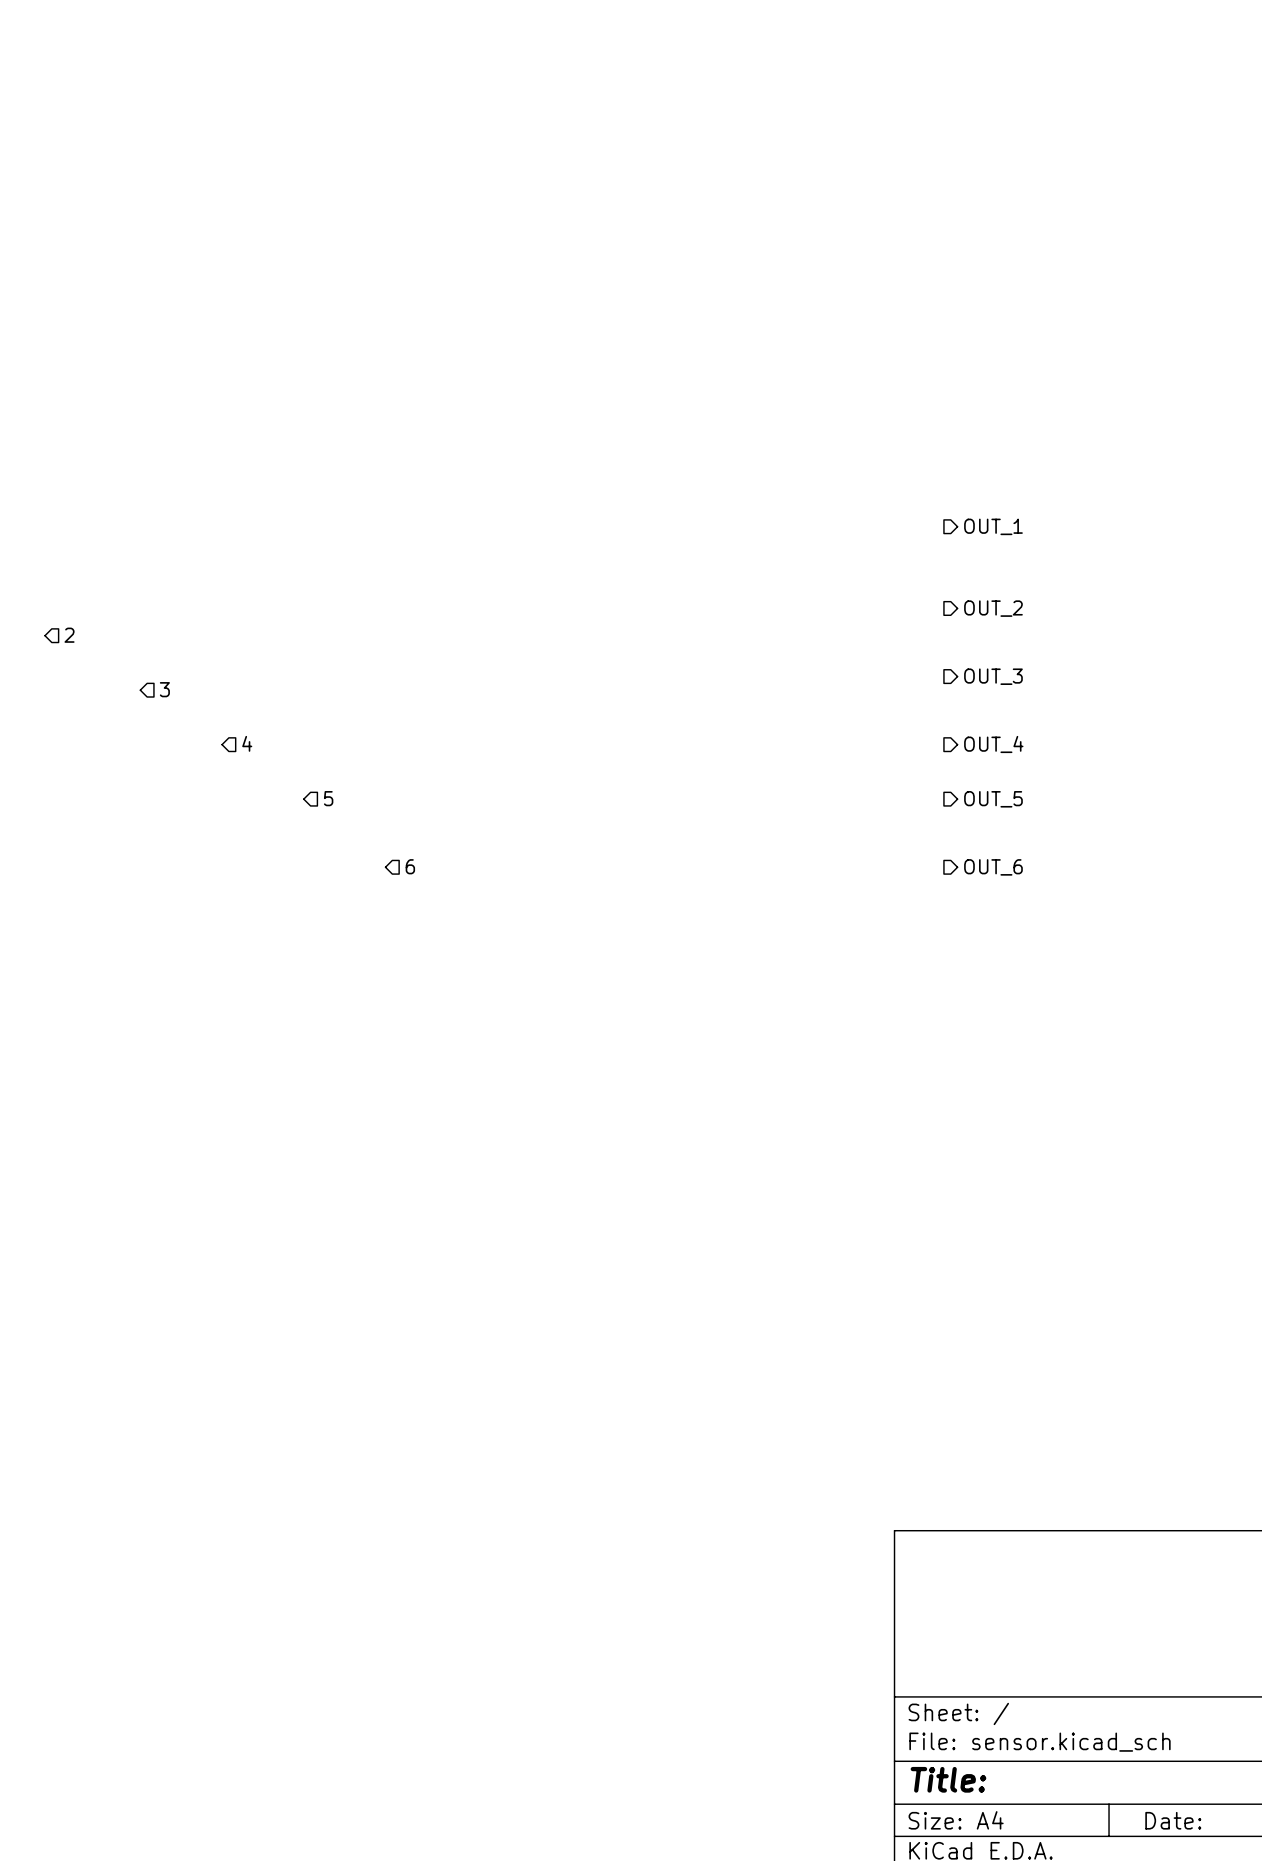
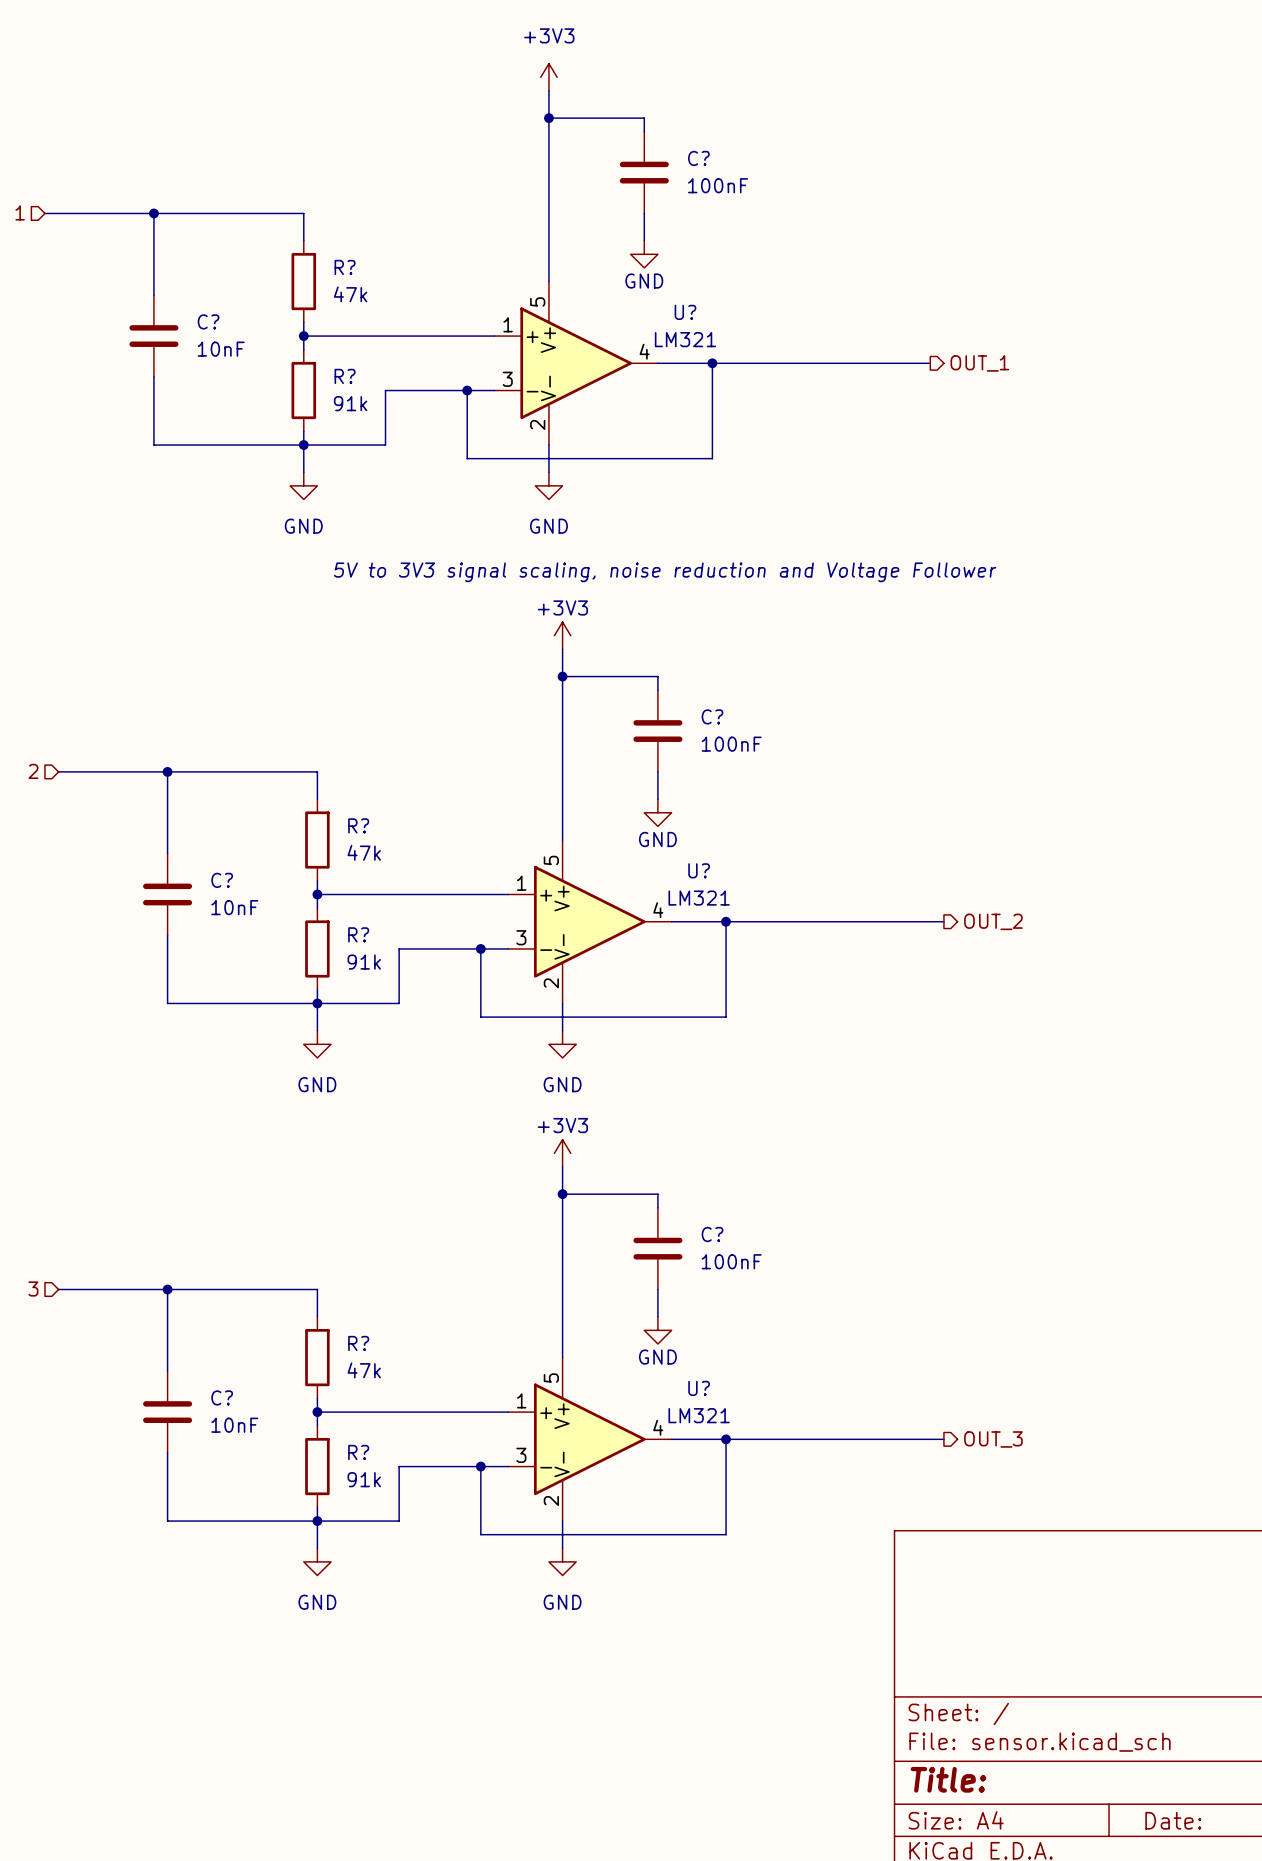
power symbol: none -> +3V3 (548, 77)
wire: none -> (548, 90) (548, 281)
wire: none -> (548, 118) (644, 118) (644, 131)
junction: none -> (548, 118)
C?: none -> 100nF (644, 172)
hierarchical label: none -> 1 (20, 212)
wire: none -> (44, 213) (303, 213) (303, 240)
wire: none -> (153, 213) (153, 295)
junction: none -> (153, 213)
wire: none -> (644, 213) (644, 240)
power symbol: none -> GND (644, 254)
R?: none -> 47k (303, 281)
wire: none -> (303, 322) (303, 349)
C?: none -> 10nF (153, 336)
wire: none -> (303, 336) (494, 336)
junction: none -> (303, 336)
U?: none -> LM321 (576, 363)
wire: none -> (657, 363) (930, 363)
wire: none -> (712, 363) (712, 458) (467, 458) (467, 390)
junction: none -> (712, 363)
wire: none -> (153, 376) (153, 445) (385, 445) (385, 390) (494, 390)
R?: none -> 91k (303, 390)
junction: none -> (467, 390)
wire: none -> (303, 431) (303, 472)
junction: none -> (303, 445)
wire: none -> (548, 445) (548, 472)
power symbol: none -> GND (303, 485)
power symbol: none -> GND (548, 485)
hierarchical label position: OUT_1 (993, 526) -> OUT_1 (979, 363)
text: none -> 5V to 3V3 signal scaling, noise reduction and Voltage Follower (665, 572)
hierarchical label: OUT_2 (993, 608) -> none
hierarchical label rotation: 0° (69, 635) -> 180° (33, 771)
hierarchical label position: 2 (69, 635) -> 2 (33, 771)
power symbol: none -> +3V3 (562, 635)
wire: none -> (562, 649) (562, 840)
wire: none -> (562, 676) (657, 676) (657, 690)
junction: none -> (562, 676)
hierarchical label: OUT_3 (993, 676) -> none
hierarchical label: 3 (164, 689) -> none
C?: none -> 100nF (657, 731)
hierarchical label: 4 (247, 743) -> none
hierarchical label: OUT_4 (993, 744) -> none
wire: none -> (58, 771) (317, 771) (317, 799)
wire: none -> (167, 771) (167, 853)
junction: none -> (167, 771)
wire: none -> (657, 771) (657, 799)
hierarchical label: 5 (328, 798) -> none
hierarchical label: OUT_5 (993, 799) -> none
power symbol: none -> GND (657, 812)
R?: none -> 47k (317, 840)
hierarchical label: 6 (410, 866) -> none
hierarchical label: OUT_6 (993, 867) -> none
wire: none -> (317, 880) (317, 908)
C?: none -> 10nF (167, 894)
wire: none -> (317, 894) (508, 894)
junction: none -> (317, 894)
U?: none -> LM321 (589, 921)
wire: none -> (671, 921) (943, 921)
wire: none -> (726, 921) (726, 1017) (480, 1017) (480, 948)
junction: none -> (726, 921)
hierarchical label: none -> OUT_2 (993, 921)
wire: none -> (167, 935) (167, 1003) (399, 1003) (399, 948) (508, 948)
R?: none -> 91k (317, 948)
junction: none -> (480, 948)
wire: none -> (317, 989) (317, 1030)
junction: none -> (317, 1003)
wire: none -> (562, 1003) (562, 1030)
power symbol: none -> GND (317, 1044)
power symbol: none -> GND (562, 1044)
power symbol: none -> +3V3 (562, 1153)
wire: none -> (562, 1166) (562, 1357)
wire: none -> (562, 1194) (657, 1194) (657, 1207)
junction: none -> (562, 1194)
C?: none -> 100nF (657, 1248)
hierarchical label: none -> 3 (33, 1288)
wire: none -> (58, 1289) (317, 1289) (317, 1316)
wire: none -> (167, 1289) (167, 1371)
junction: none -> (167, 1289)
wire: none -> (657, 1289) (657, 1316)
power symbol: none -> GND (657, 1330)
R?: none -> 47k (317, 1357)
wire: none -> (317, 1398) (317, 1425)
C?: none -> 10nF (167, 1412)
wire: none -> (317, 1412) (508, 1412)
junction: none -> (317, 1412)
U?: none -> LM321 (589, 1439)
wire: none -> (671, 1439) (943, 1439)
wire: none -> (726, 1439) (726, 1534) (480, 1534) (480, 1466)
junction: none -> (726, 1439)
hierarchical label: none -> OUT_3 (993, 1439)
wire: none -> (167, 1452) (167, 1521) (399, 1521) (399, 1466) (508, 1466)
R?: none -> 91k (317, 1466)
junction: none -> (480, 1466)
wire: none -> (317, 1507) (317, 1548)
junction: none -> (317, 1521)
wire: none -> (562, 1521) (562, 1548)
power symbol: none -> GND (317, 1561)
power symbol: none -> GND (562, 1561)

